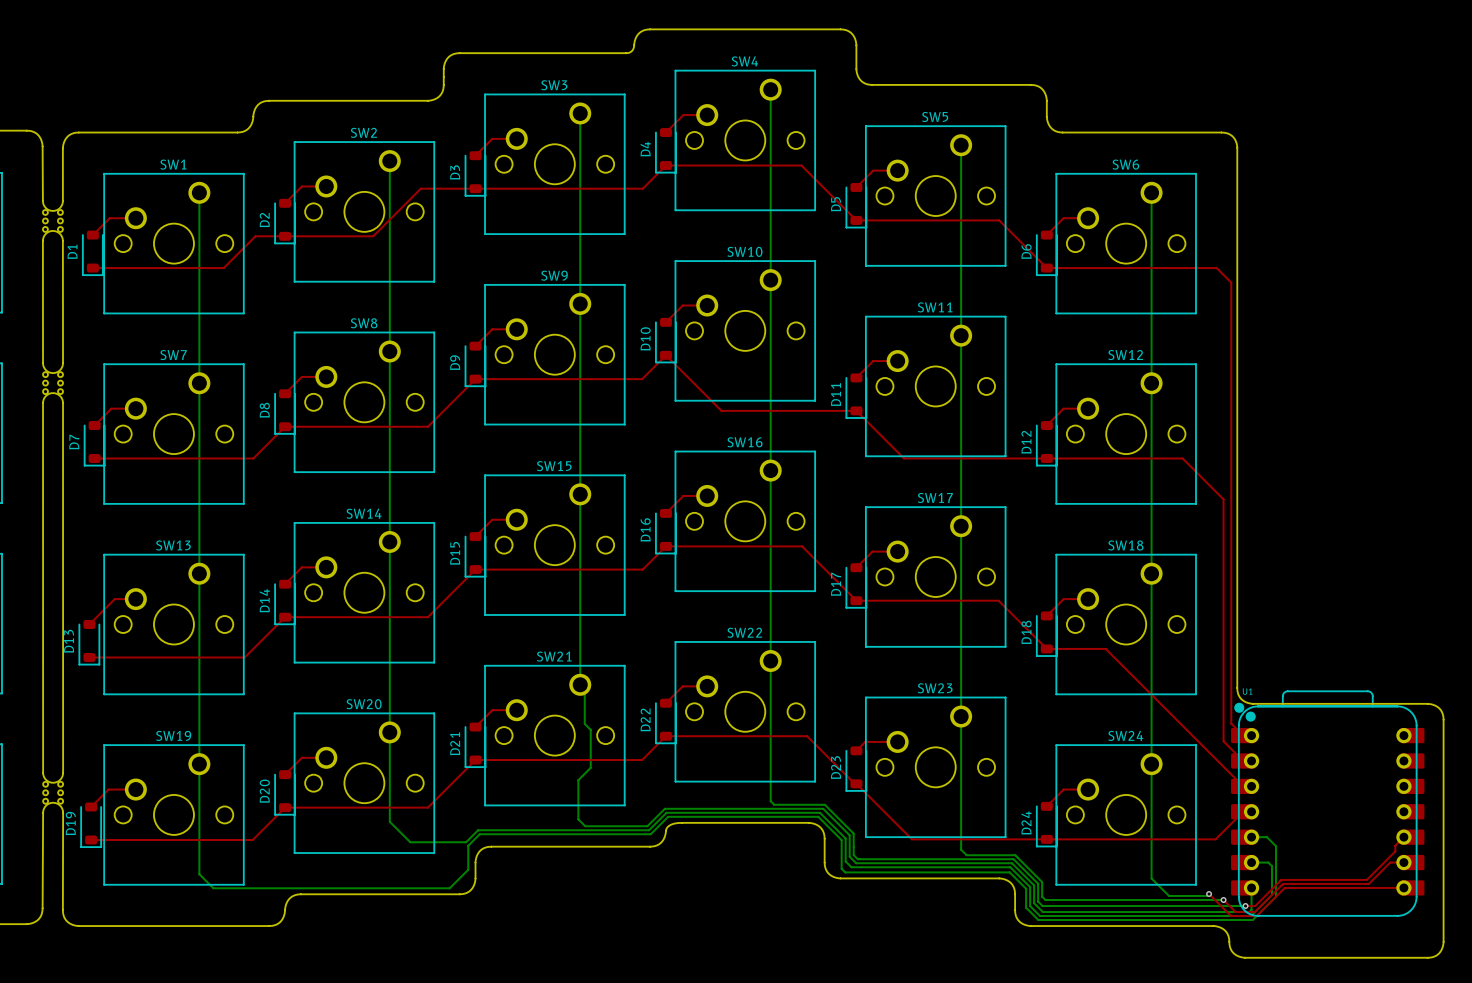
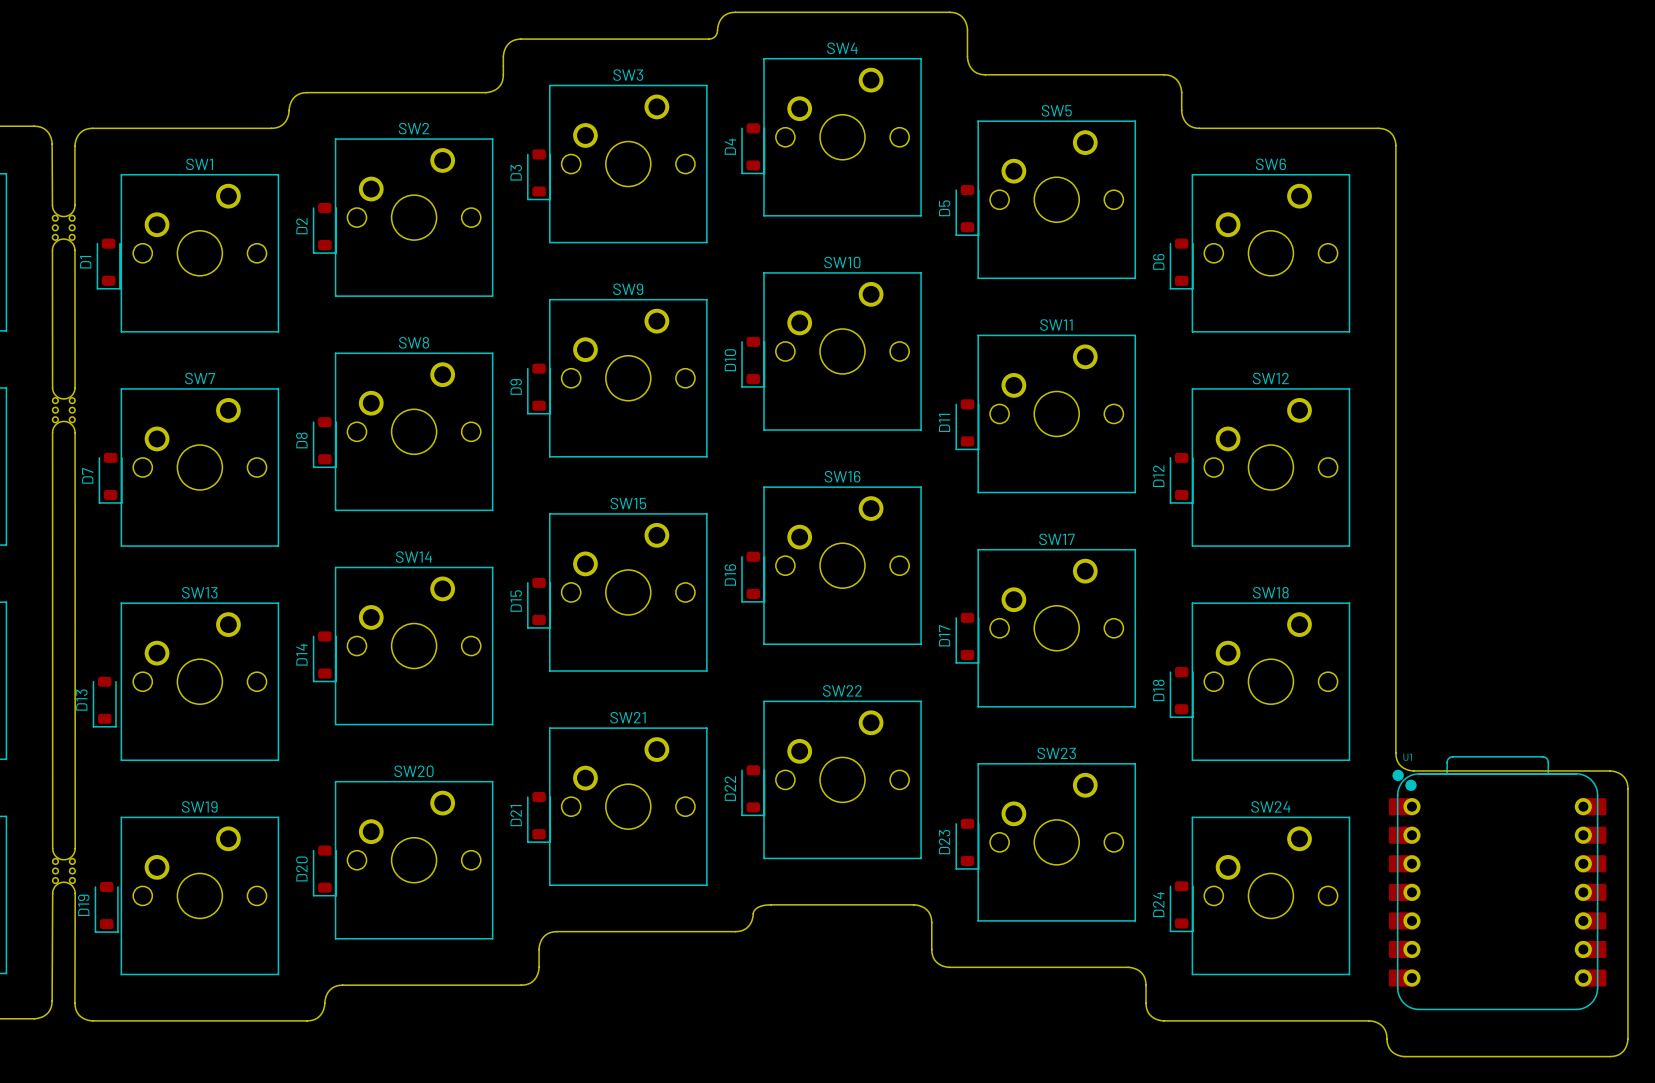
bottom track: (770, 89) (770, 801) (774, 804) (824, 804) (853, 833) (853, 855) (857, 859) (1013, 859) (1038, 883) (1038, 901) (1042, 906) (1245, 906) -> none
bottom track: (580, 113) (580, 684) (584, 689) (584, 723) (590, 729) (590, 767) (578, 780) (578, 819) (585, 826) (647, 826) (664, 808) (823, 808) (849, 835) (849, 856) (856, 863) (1011, 863) (1034, 885) (1034, 903) (1042, 912) (1249, 912) (1251, 909) (1251, 887) -> none
top track: (707, 115) (683, 115) (665, 132) -> none
top track: (516, 138) (492, 138) (475, 155) -> none
bottom track: (961, 145) (961, 849) (966, 855) (1015, 855) (1042, 882) (1042, 896) (1045, 900) (1223, 900) -> none
bottom track: (389, 161) (389, 821) (410, 842) (466, 842) (478, 830) (649, 830) (666, 812) (819, 812) (845, 838) (845, 861) (851, 867) (1010, 867) (1030, 887) (1030, 906) (1040, 916) (1251, 916) (1272, 895) (1272, 866) (1268, 862) (1251, 862) -> none
top track: (897, 170) (873, 170) (856, 187) -> none
top track: (326, 186) (301, 186) (285, 203) -> none
bottom track: (199, 192) (199, 874) (213, 888) (449, 888) (468, 869) (468, 845) (479, 834) (650, 834) (668, 816) (818, 816) (841, 840) (841, 868) (845, 872) (1009, 872) (1026, 888) (1026, 907) (1038, 920) (1252, 920) (1276, 896) (1276, 846) (1266, 837) (1251, 837) -> none
bottom track: (1151, 192) (1151, 878) (1169, 896) (1207, 896) (1209, 894) -> none
top track: (135, 218) (109, 218) (92, 235) -> none
top track: (1088, 218) (1063, 218) (1046, 235) -> none
top track: (92, 268) (223, 268) (255, 236) (373, 236) (420, 188) (642, 188) (665, 165) (801, 165) (856, 220) (999, 220) (1046, 268) (1216, 268) (1231, 282) (1231, 723) (1243, 735) -> none
top track: (707, 305) (682, 305) (665, 322) -> none
top track: (516, 329) (492, 329) (475, 346) -> none
top track: (897, 361) (873, 361) (856, 377) -> none
top track: (326, 376) (301, 376) (285, 393) -> none
top track: (135, 408) (111, 408) (94, 425) -> none
top track: (1088, 408) (1063, 408) (1046, 425) -> none
top track: (94, 458) (253, 458) (285, 426) (427, 426) (475, 379) (642, 379) (665, 355) (721, 410) (856, 410) (904, 458) (1182, 458) (1223, 499) (1223, 741) (1243, 760) -> none
top track: (707, 495) (683, 495) (665, 513) -> none
top track: (516, 519) (492, 519) (475, 536) -> none
top track: (897, 551) (872, 551) (856, 567) -> none
top track: (326, 567) (301, 567) (285, 584) -> none
top track: (135, 599) (114, 599) (89, 624) -> none
top track: (1088, 599) (1063, 599) (1046, 615) -> none
top track: (89, 657) (244, 657) (285, 617) (427, 617) (475, 569) (642, 569) (665, 546) (802, 546) (856, 600) (998, 600) (1046, 648) (1105, 648) (1243, 786) -> none
top track: (707, 686) (682, 686) (665, 703) -> none
top track: (516, 710) (492, 710) (475, 727) -> none
top track: (897, 741) (865, 741) (856, 750) -> none
top track: (326, 757) (301, 757) (285, 774) -> none
top track: (135, 789) (108, 789) (91, 807) -> none
top track: (1088, 789) (1063, 789) (1046, 806) -> none
top track: (1243, 811) (1215, 839) (911, 839) (807, 736) (665, 736) (642, 760) (475, 760) (427, 807) (285, 807) (252, 839) (91, 839) -> none
top track: (1403, 837) (1395, 845) (1395, 851) (1366, 879) (1280, 880) -> none
top track: (1403, 862) (1390, 862) (1368, 883) (1281, 885) -> none
top track: (1280, 880) (1255, 906) (1245, 906) -> none
top track: (1281, 885) (1254, 912) (1235, 912) (1223, 900) -> none
top track: (1403, 887) (1284, 887) (1256, 916) (1231, 916) (1209, 894) -> none
via: (1209, 894) -> none
via: (1223, 900) -> none
via: (1245, 906) -> none

